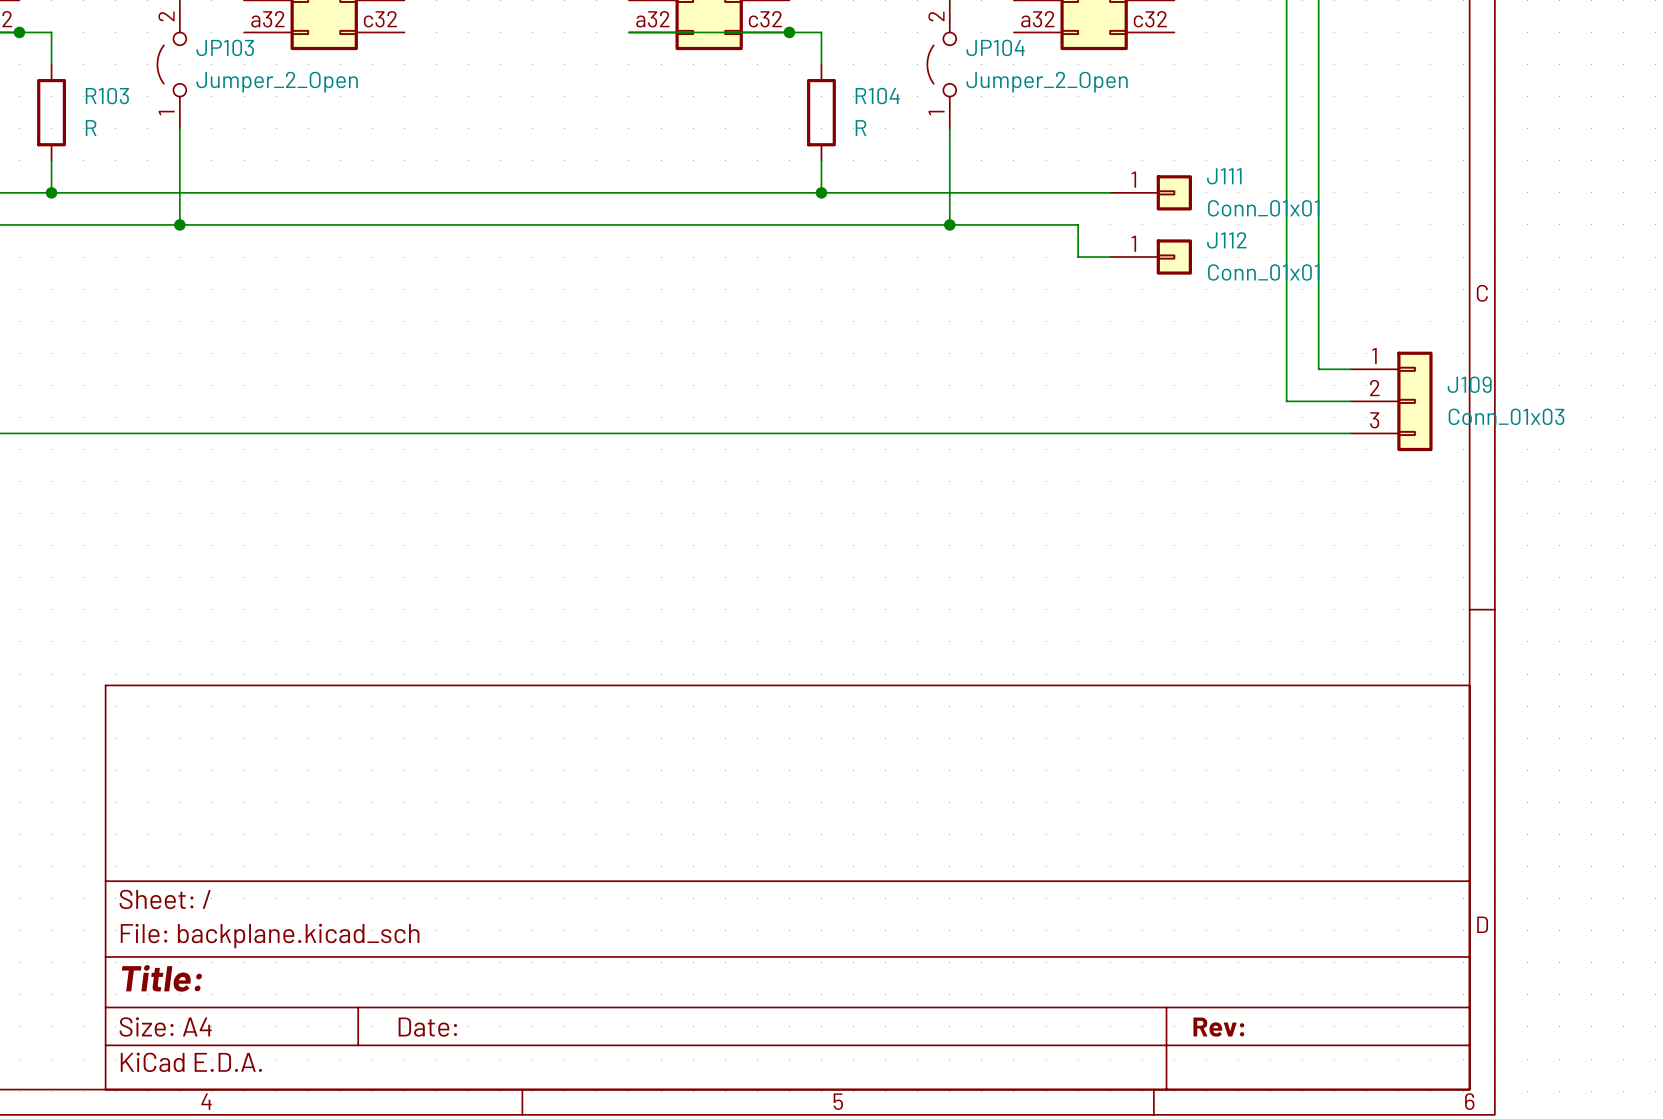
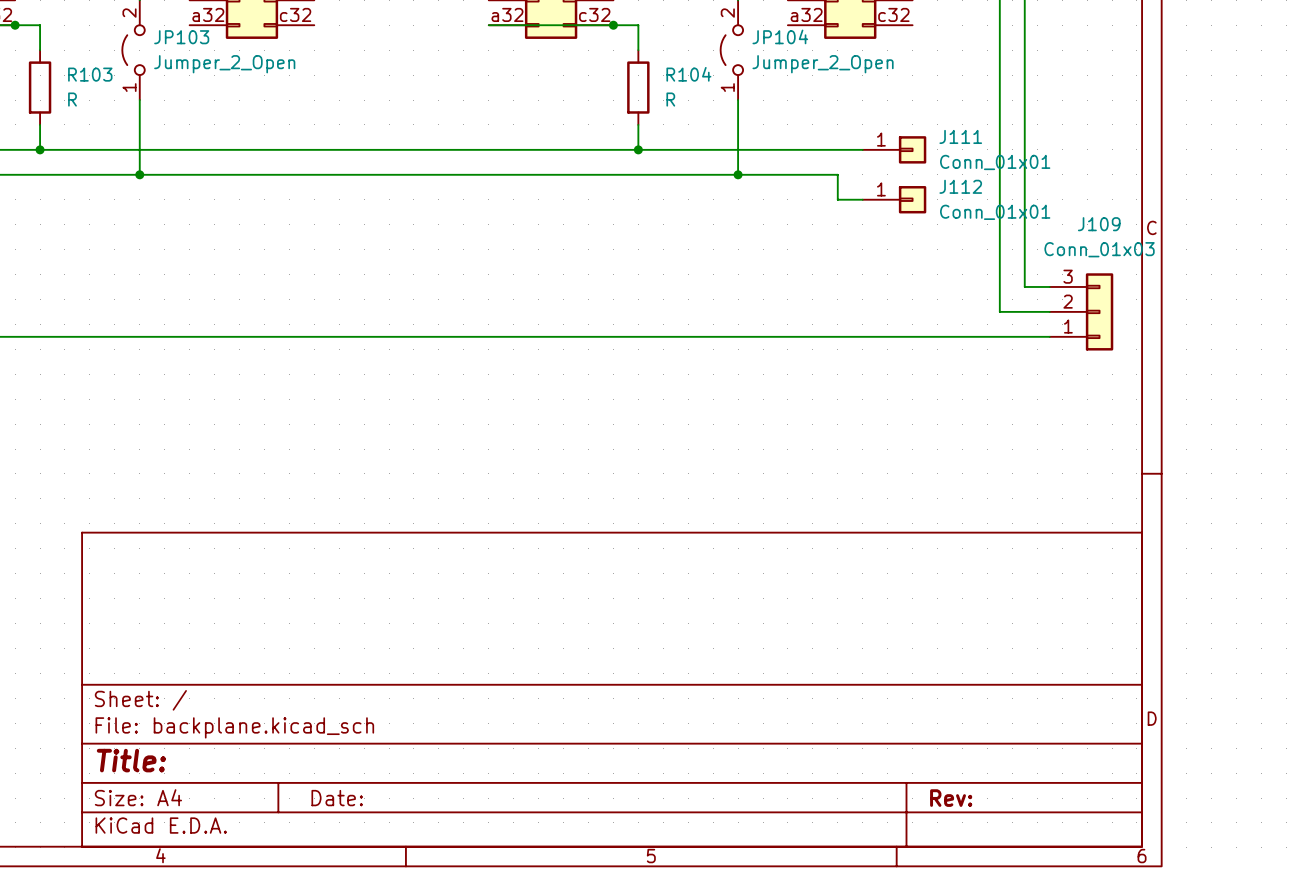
J109 name position: J109 (1469, 384) -> J109 (1099, 224)
J109 flip: as is (1414, 401) -> up-down (1099, 311)
J109 value position: Conn_01x03 (1506, 416) -> Conn_01x03 (1099, 249)

